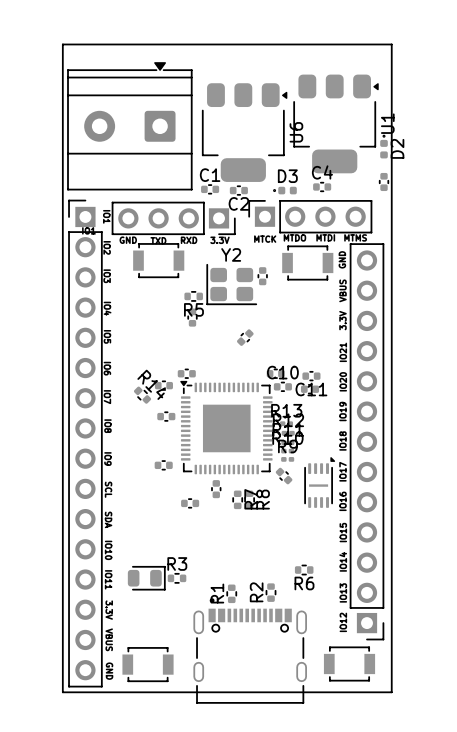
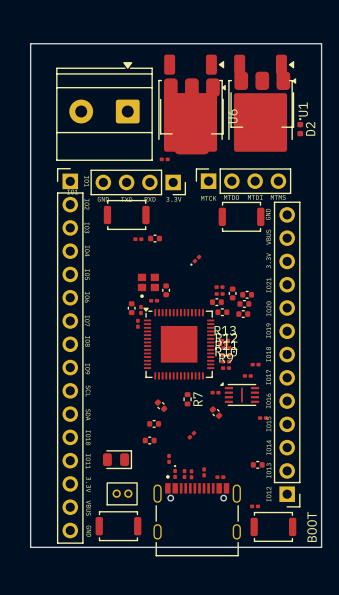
board edge: (62, 44) (391, 44) (391, 692) (62, 692) (62, 44) -> (30, 43) (30, 547) (321, 547) (321, 43) (30, 43)
part: none -> (191, 103)
part: none -> (261, 103)
part: (384, 181) -> none
C4: (322, 186) -> none
part: none -> (164, 159)
C1: (210, 189) -> none
C2: (238, 190) -> none
D3: (285, 190) -> none
part footprint: [133, 243, 185, 278] -> [103, 200, 150, 230]
part footprint: [282, 245, 334, 281] -> [218, 201, 265, 232]
part: (262, 276) -> none
Y2: (231, 284) -> none
part: none -> (155, 238)
part: none -> (138, 239)
R5: (193, 296) -> none
part: (192, 317) -> none
part: none -> (195, 260)
part: (245, 337) -> none
part: none -> (148, 285)
part: none -> (219, 287)
part: none -> (166, 290)
part: none -> (232, 293)
part: none -> (219, 293)
part: none -> (247, 294)
part: none -> (154, 300)
C10 name: C10 (282, 372) -> none
part: (186, 373) -> none
part: none -> (140, 310)
part rotation: 0° (163, 385) -> 90° clockwise (131, 308)
C11 name: C11 (311, 389) -> none
R14: (142, 395) -> none
part: none -> (137, 323)
part: (166, 416) -> none
part: none -> (223, 344)
part: none -> (255, 364)
part: (163, 465) -> none
part: none -> (247, 375)
part position: (284, 476) -> (215, 412)
part rotation: 0° (319, 482) -> 90° counterclockwise (239, 394)
part: (216, 489) -> none
part: none -> (215, 392)
R8: (249, 499) -> none
part: (190, 503) -> none
part: none -> (160, 405)
part: none -> (263, 418)
part: none -> (154, 423)
part: none -> (191, 435)
part: none -> (149, 440)
R6: (304, 570) -> none
part: none -> (169, 458)
R3: (177, 578) -> none
part: none -> (257, 464)
R2: (271, 592) -> none
R1: (231, 593) -> none
part: none -> (175, 472)
part: none -> (204, 472)
part: none -> (184, 474)
part: none -> (191, 474)
part: none -> (220, 477)
part: none -> (122, 493)
part: none -> (255, 506)
part footprint: [122, 647, 174, 682] -> [95, 511, 142, 542]
part: (349, 663) -> none
BOOT: none -> (273, 526)

